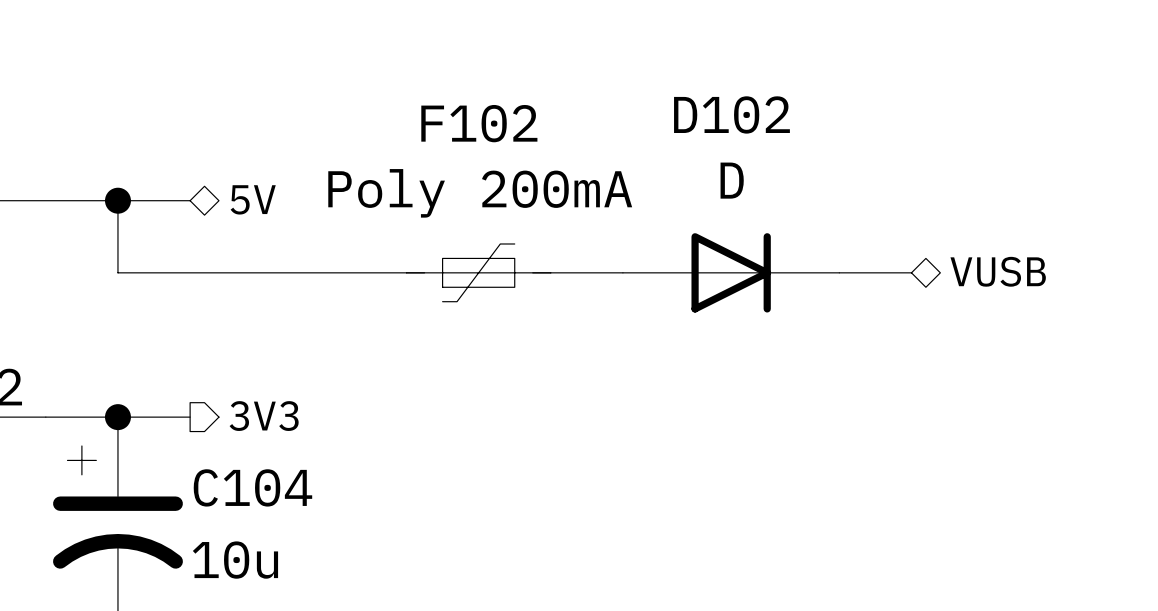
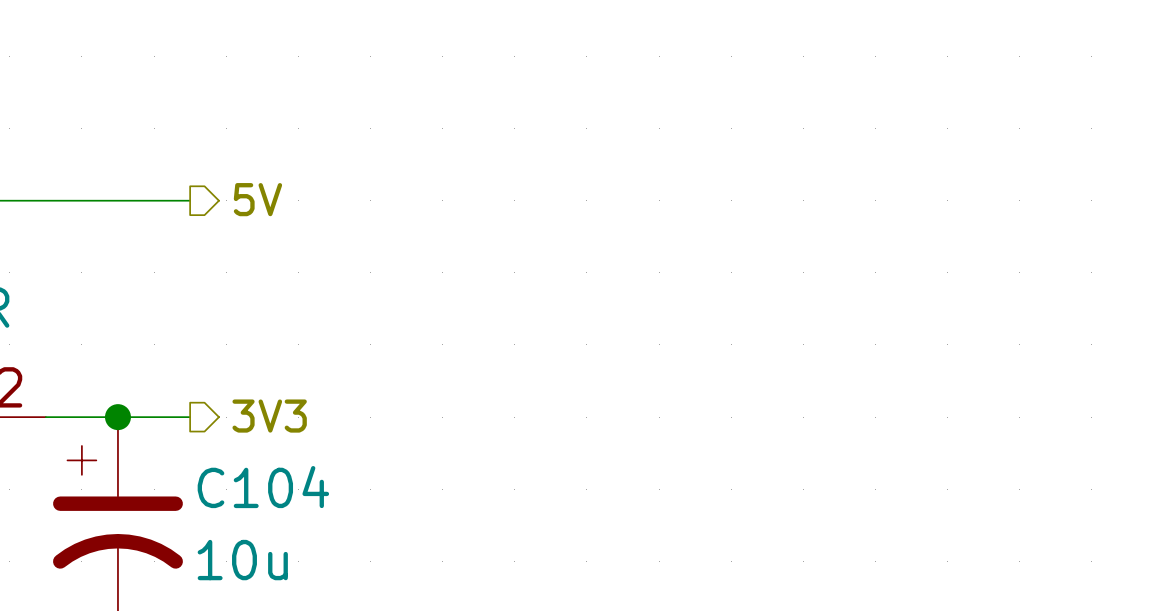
hierarchical label shape: bidirectional (253, 199) -> output (257, 199)
wire: (117, 200) (117, 272) (406, 272) -> none
junction: (117, 200) -> none
hierarchical label: VUSB (998, 271) -> none
F102: Poly 200mA (478, 272) -> none
wire: (550, 272) (622, 272) -> none
D102: D (731, 272) -> none
wire: (839, 272) (911, 272) -> none

